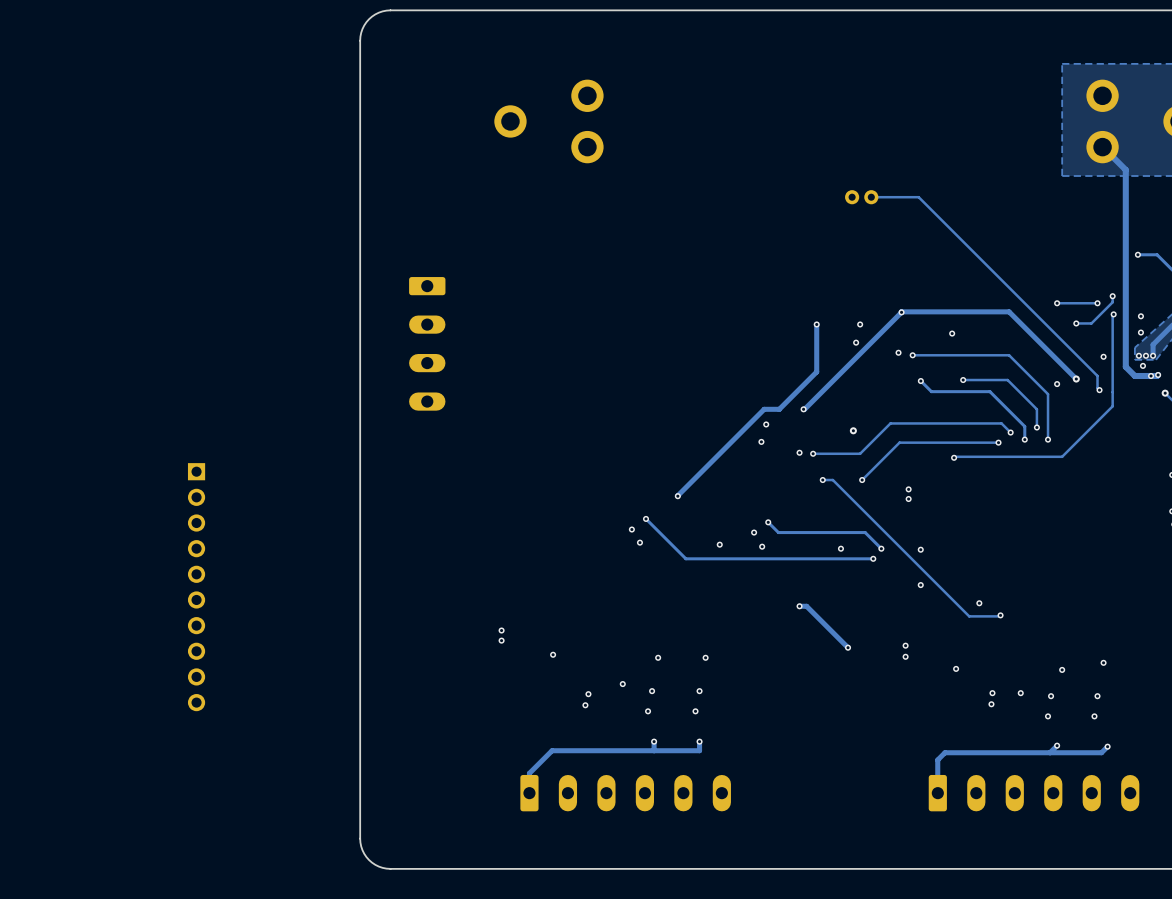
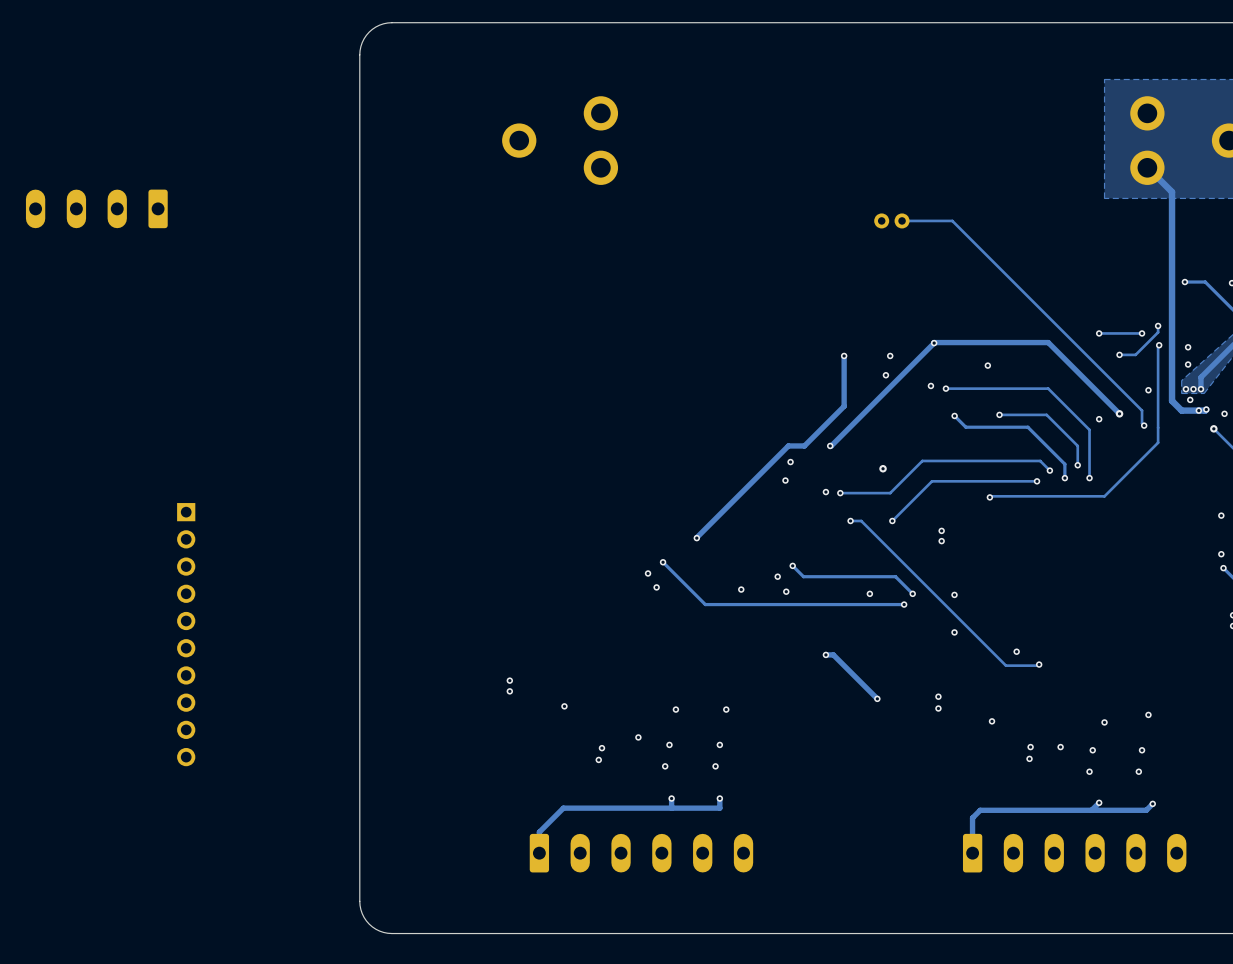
part: none -> (96, 208)
part: (427, 343) -> none

